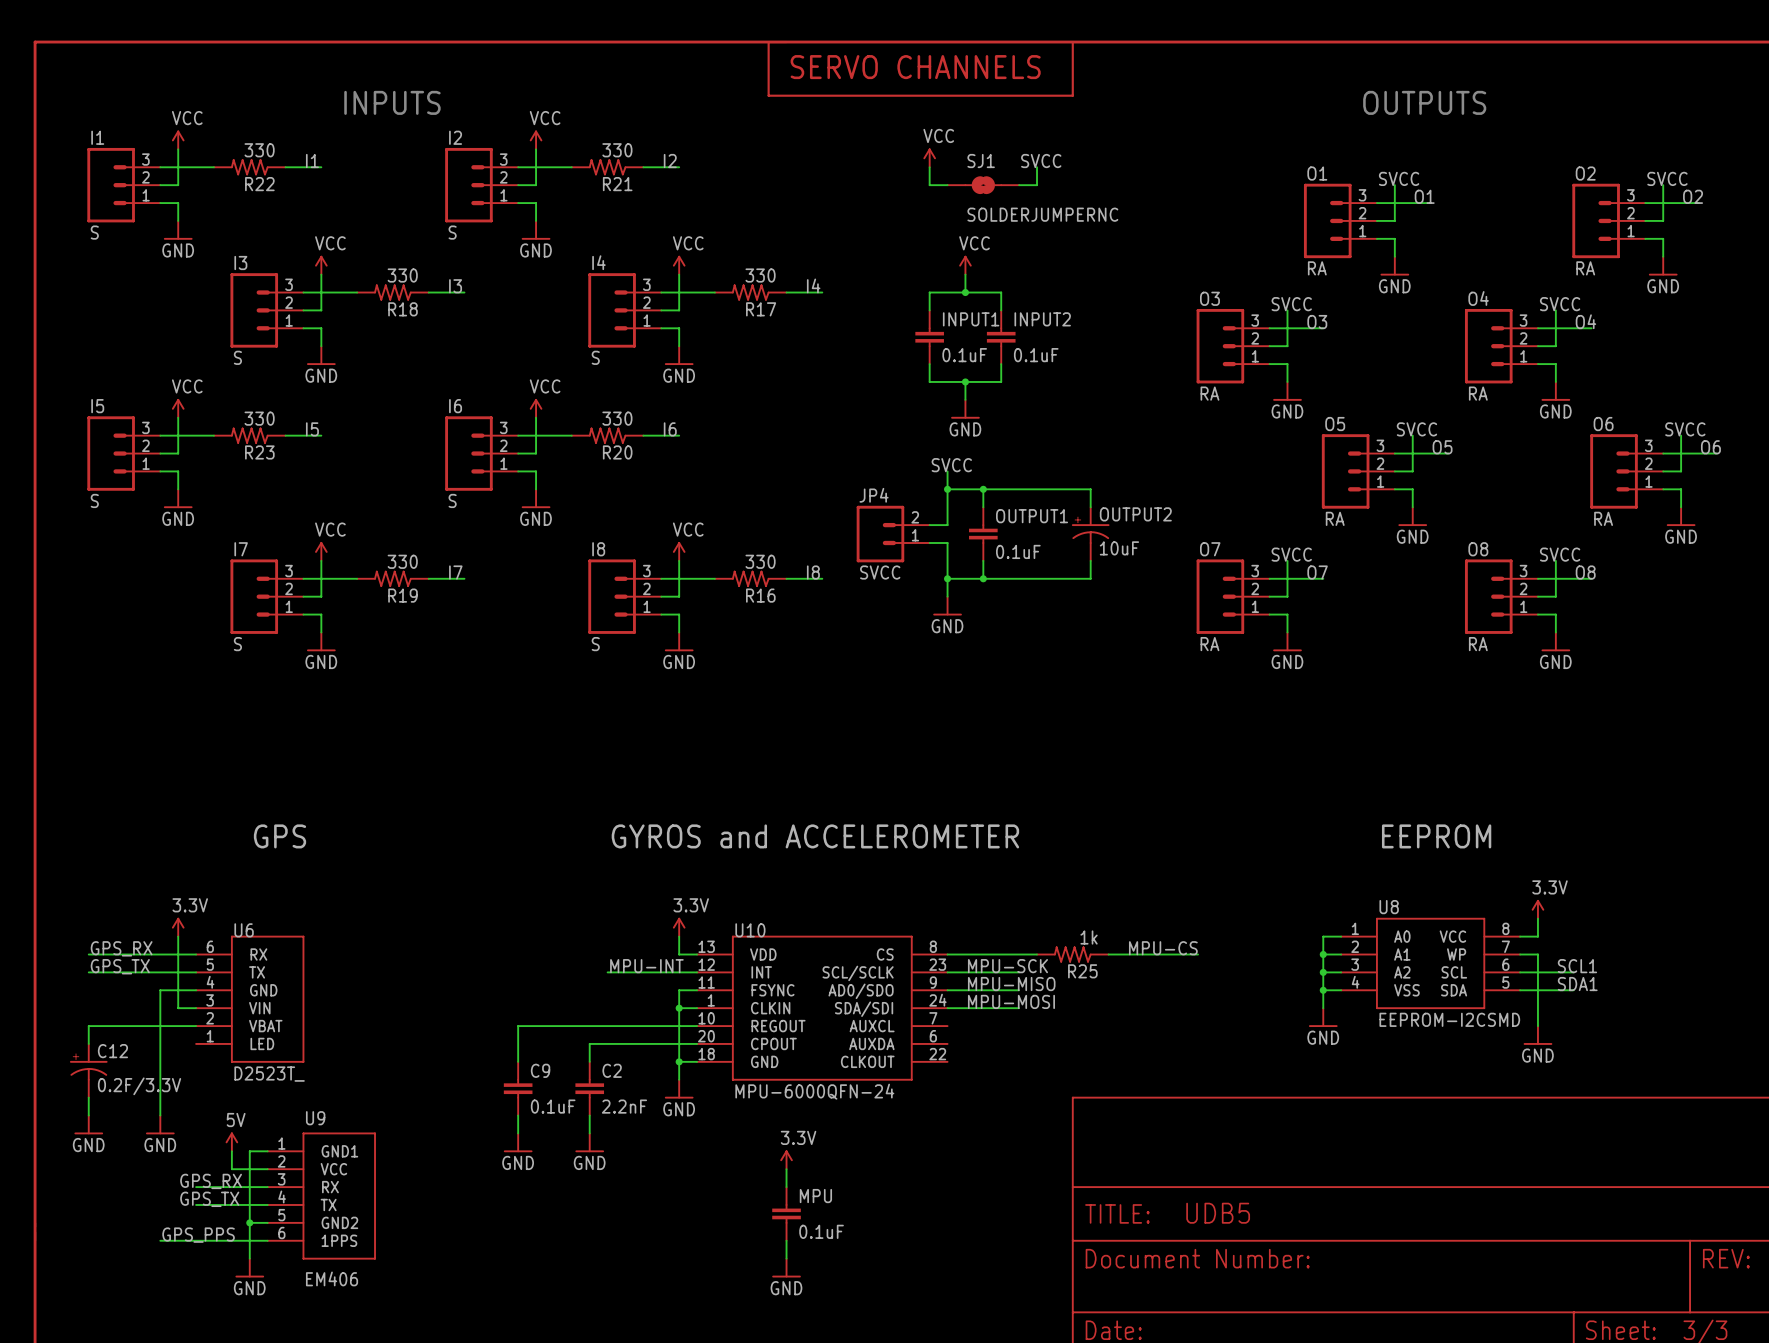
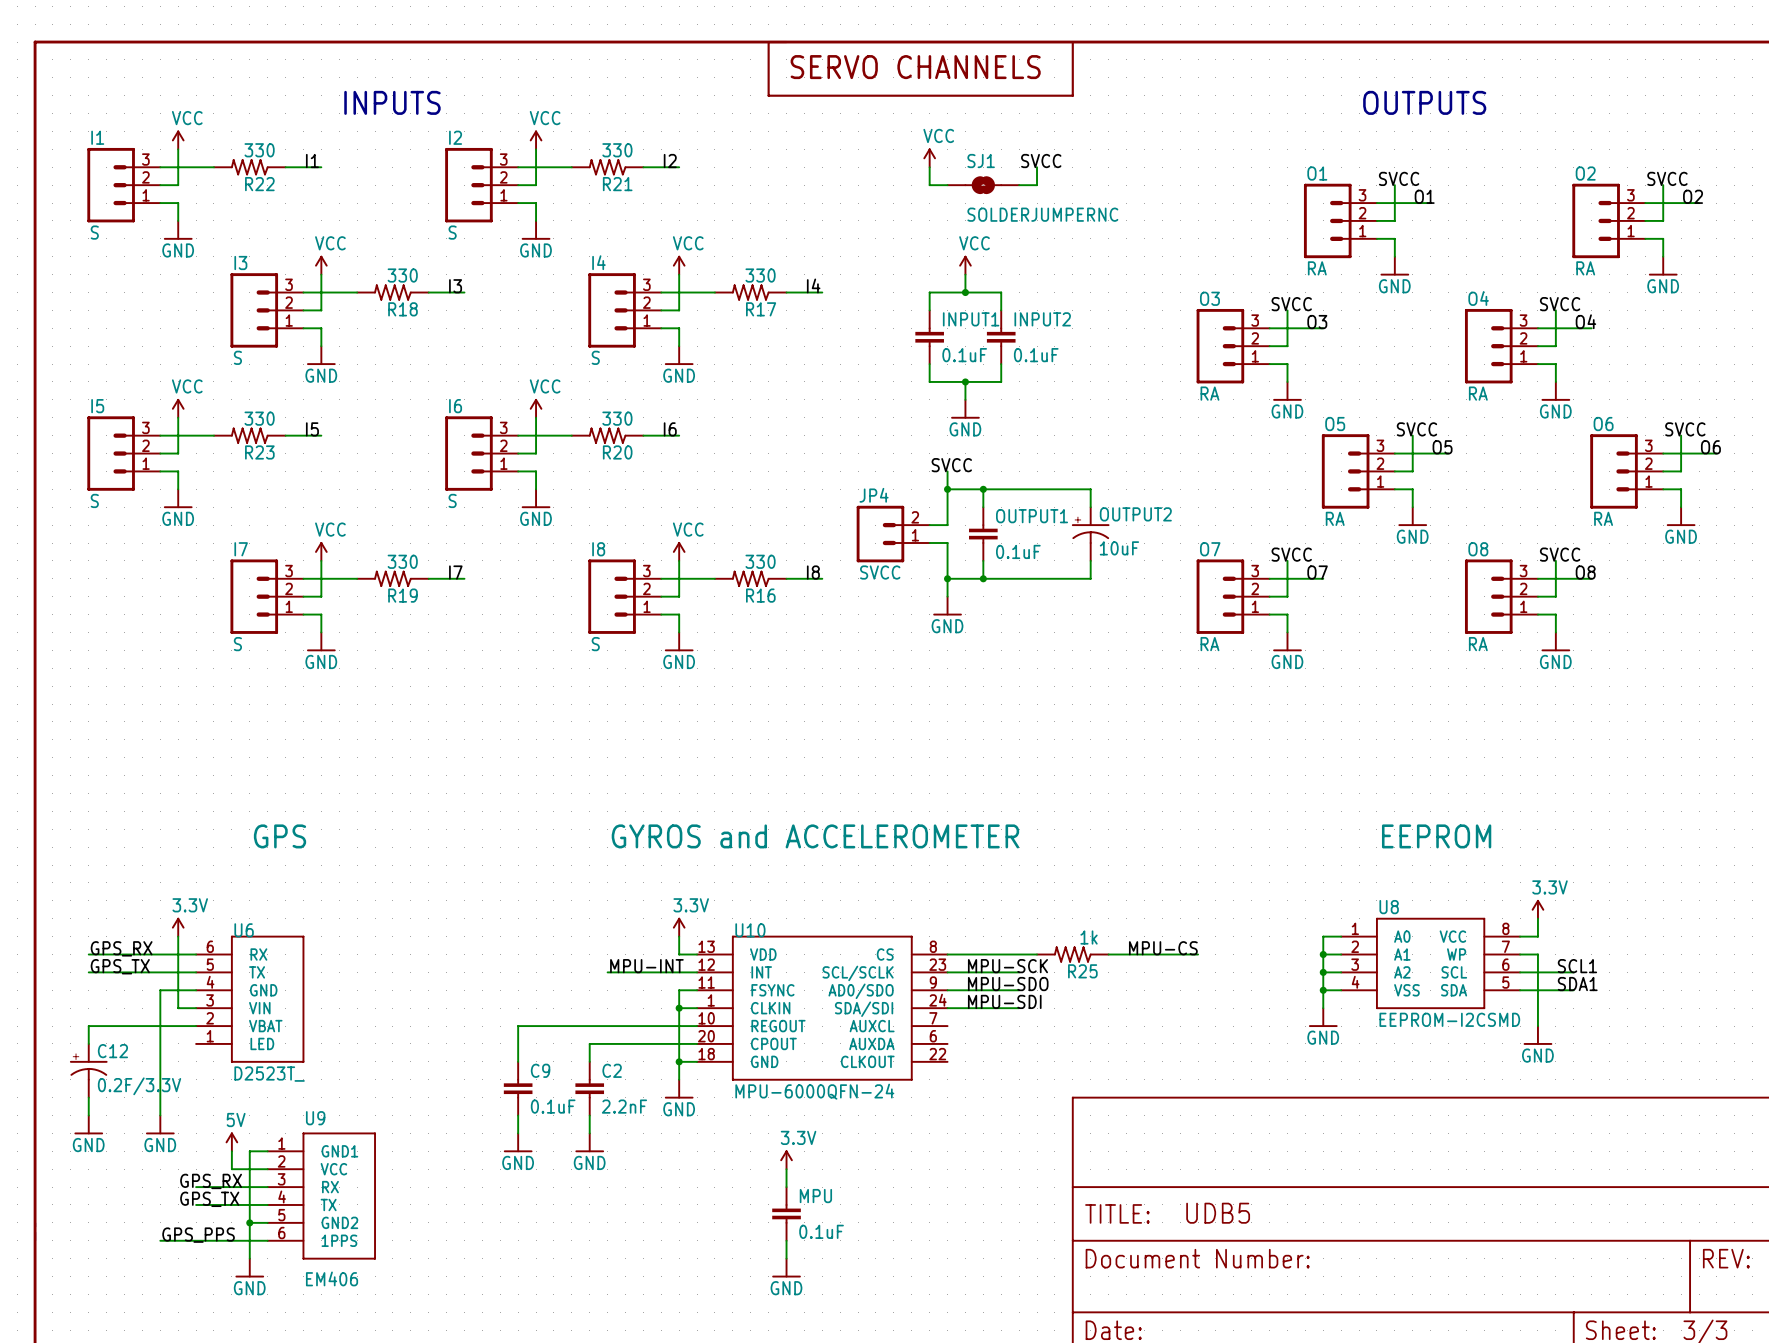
label: MPU-MISO (1011, 984) -> MPU-SDO (1008, 984)
label: MPU-MOSI (1011, 1001) -> MPU-SDI (1004, 1001)

